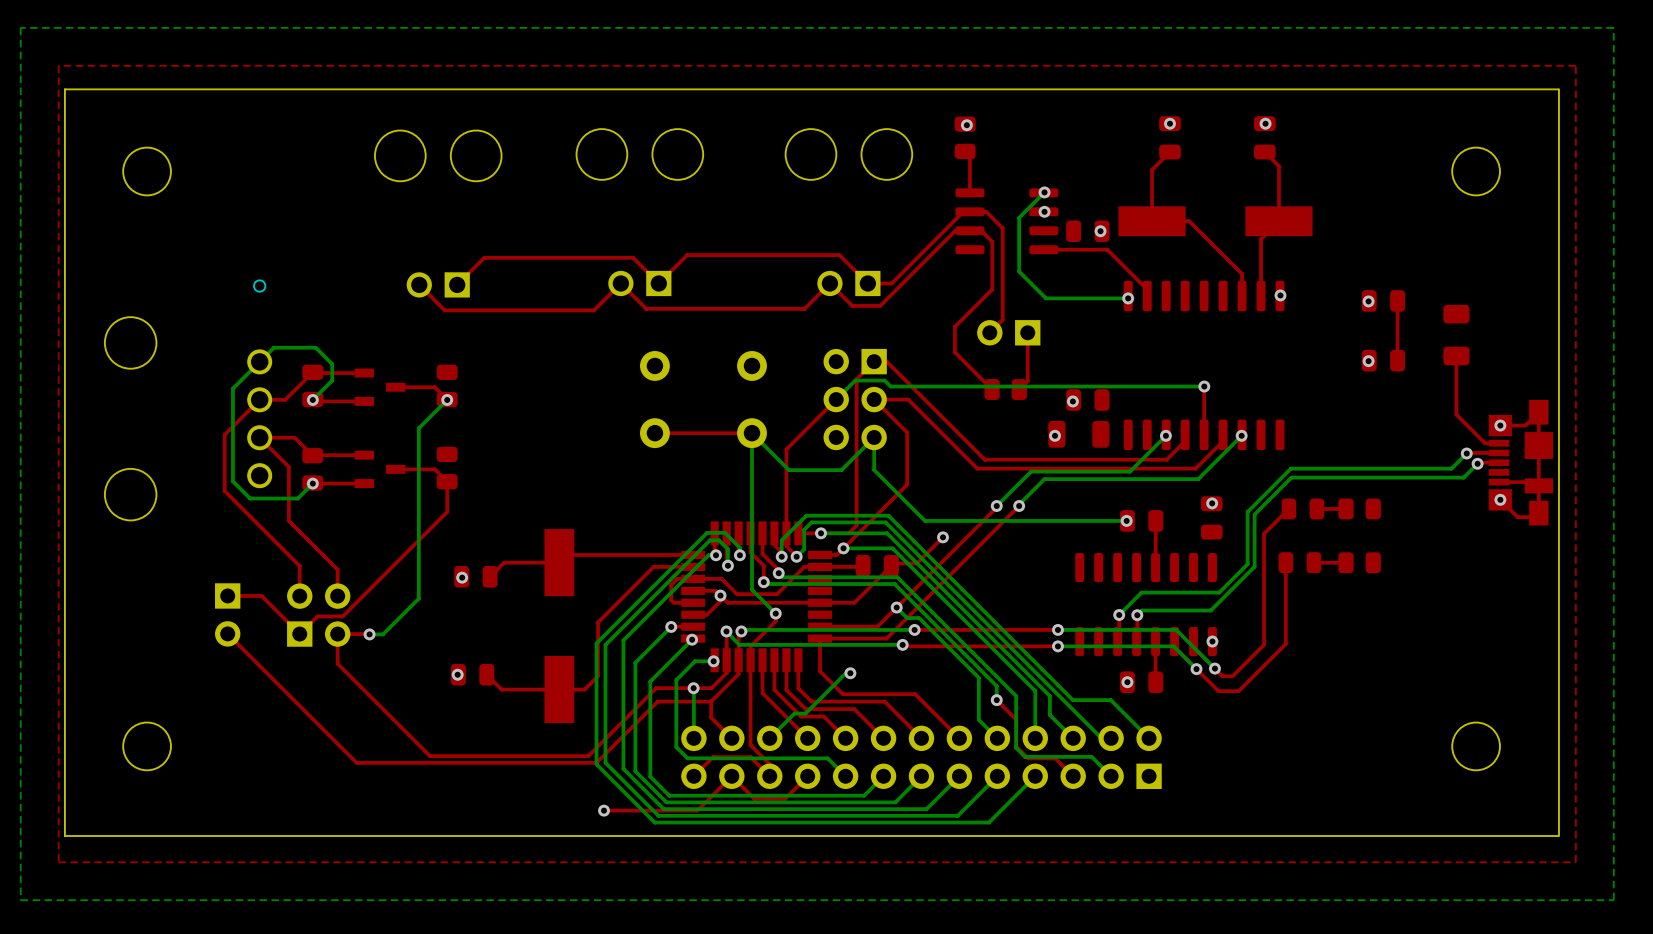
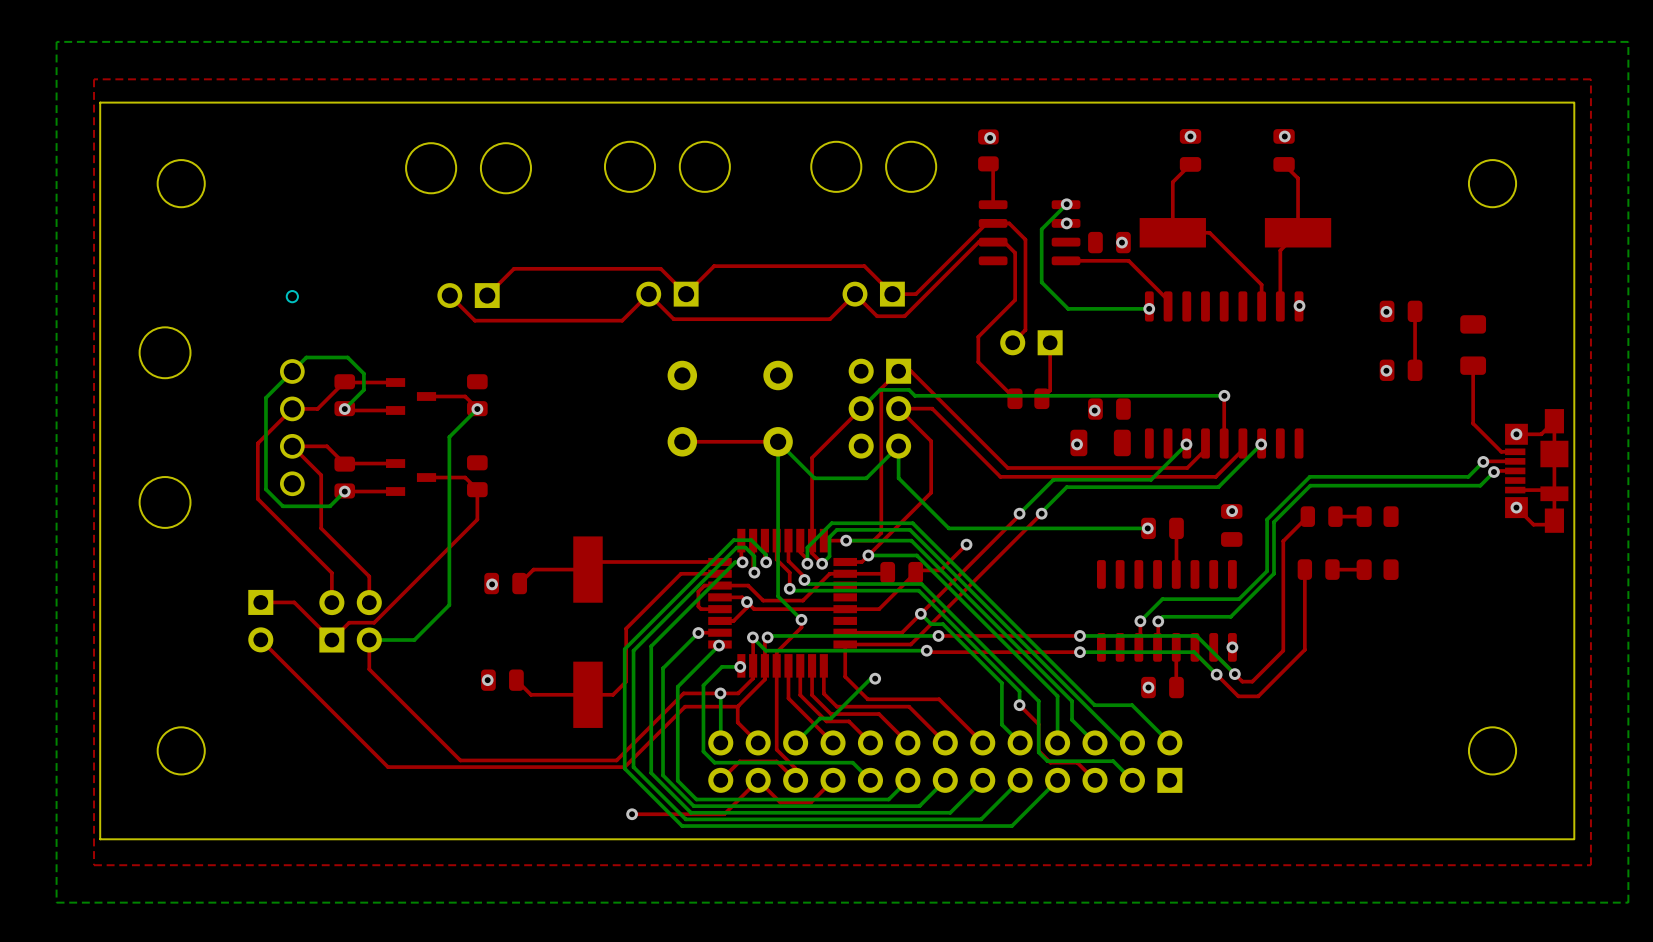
top track: (337, 634) (369, 634) -> none
via: (369, 634) -> none
bottom track: (383, 634) (369, 634) -> (414, 640) (369, 640)

